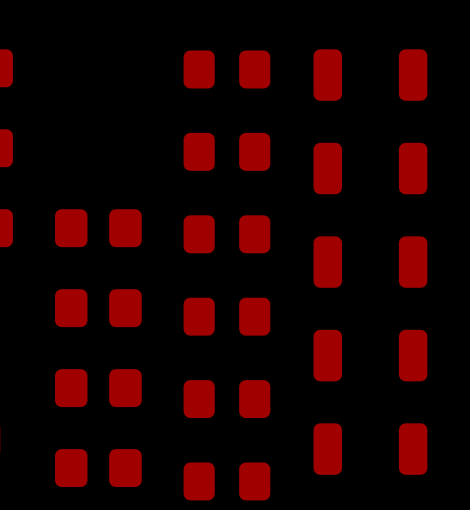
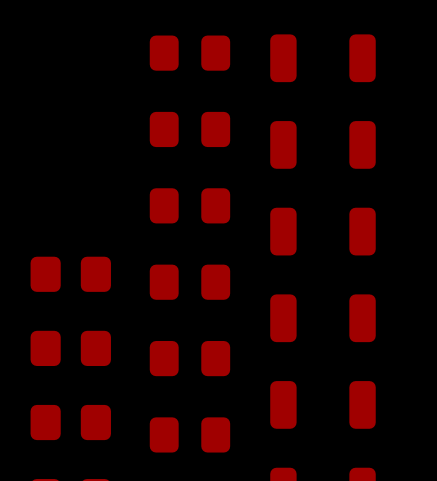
part: (98, 228) -> none

